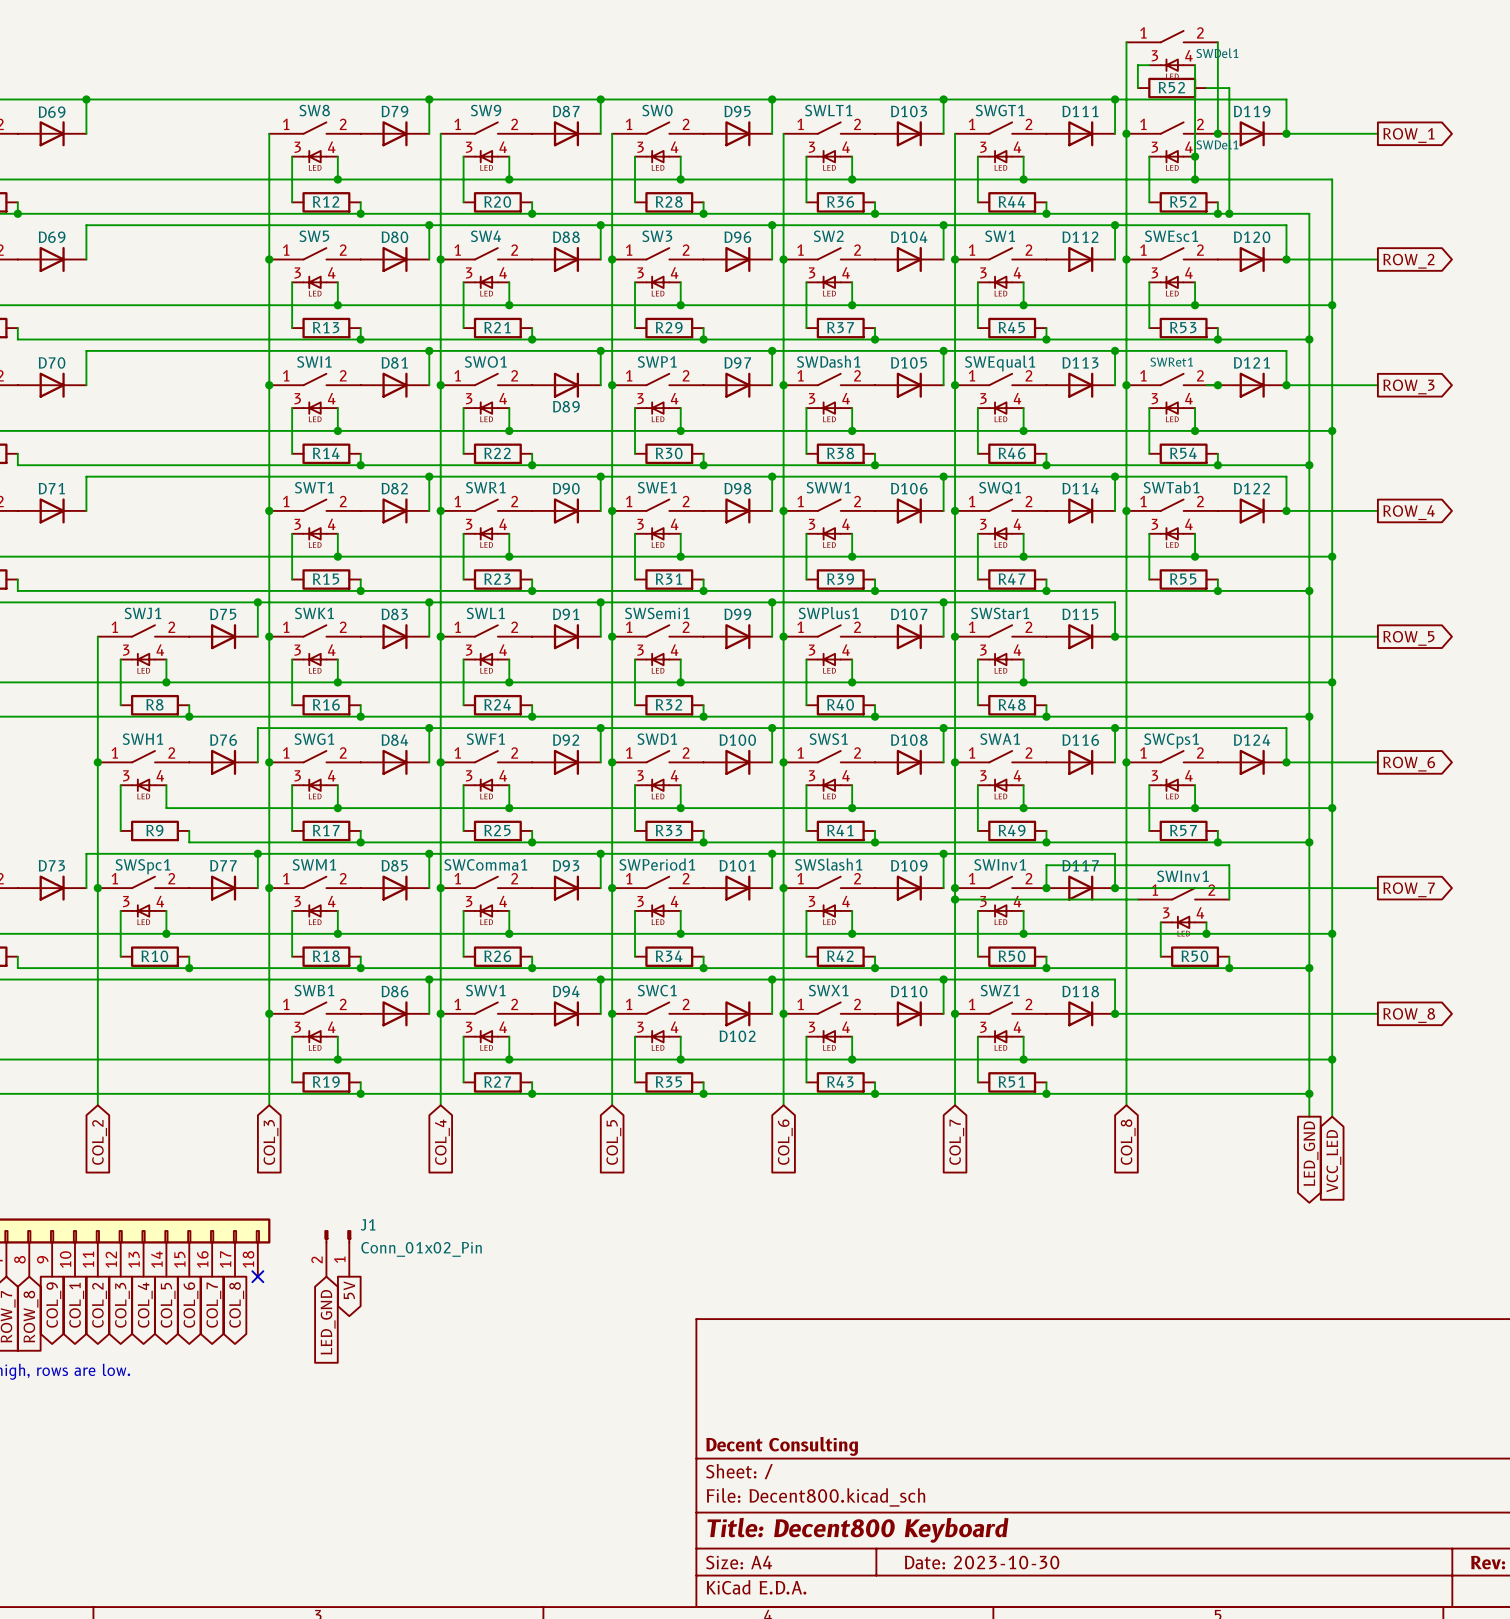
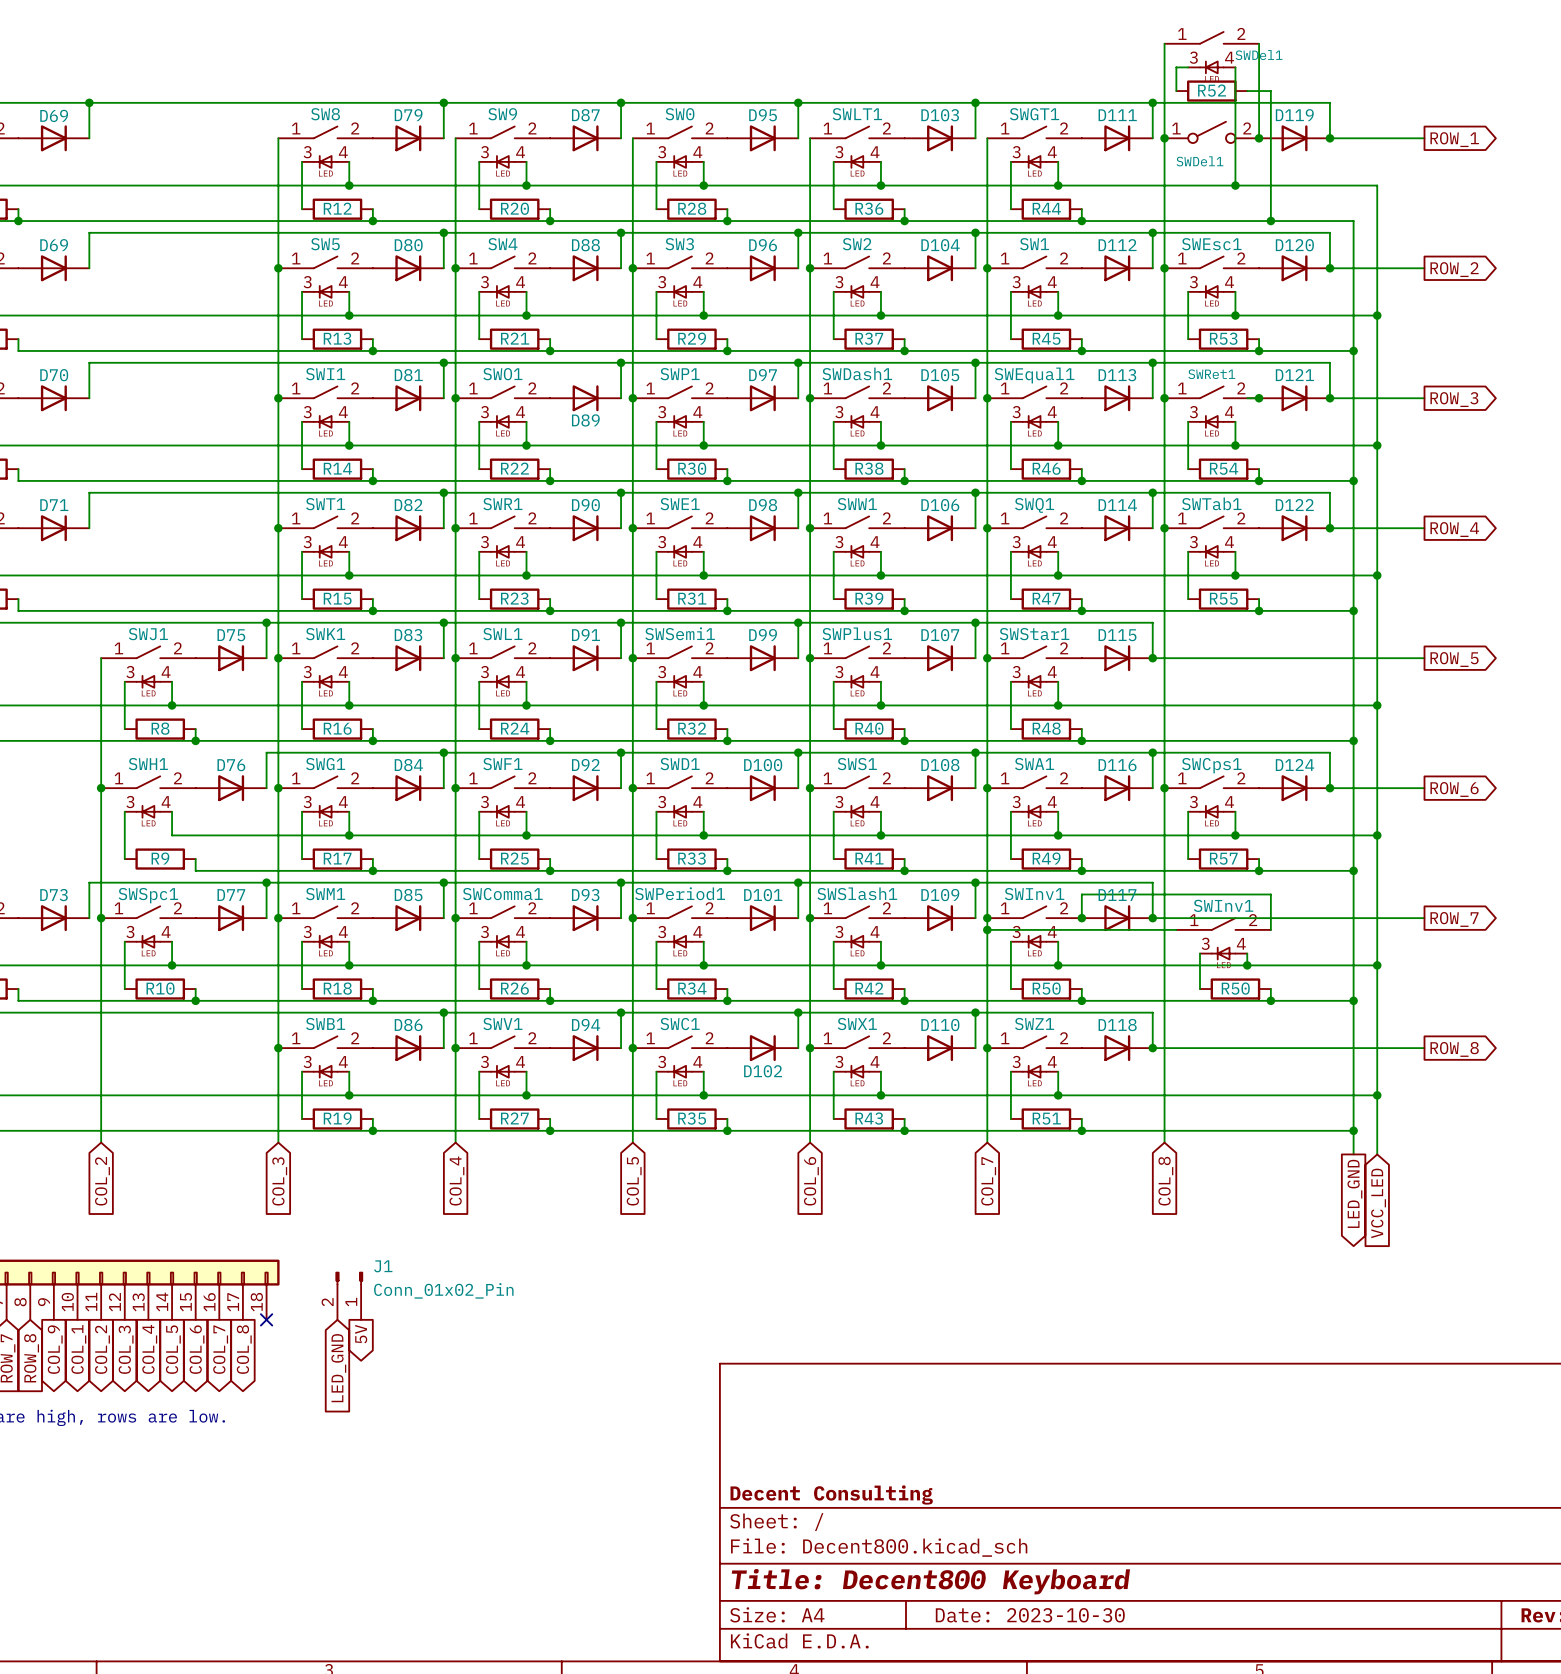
SWDel1: none -> (1211, 132)
SWDel1: (1172, 142) -> none
wire: (1149, 156) (1149, 202) -> none
junction: (1195, 156) -> none
R52: (1183, 202) -> none
wire: (1217, 202) (1217, 213) -> none
junction: (1217, 213) -> none

